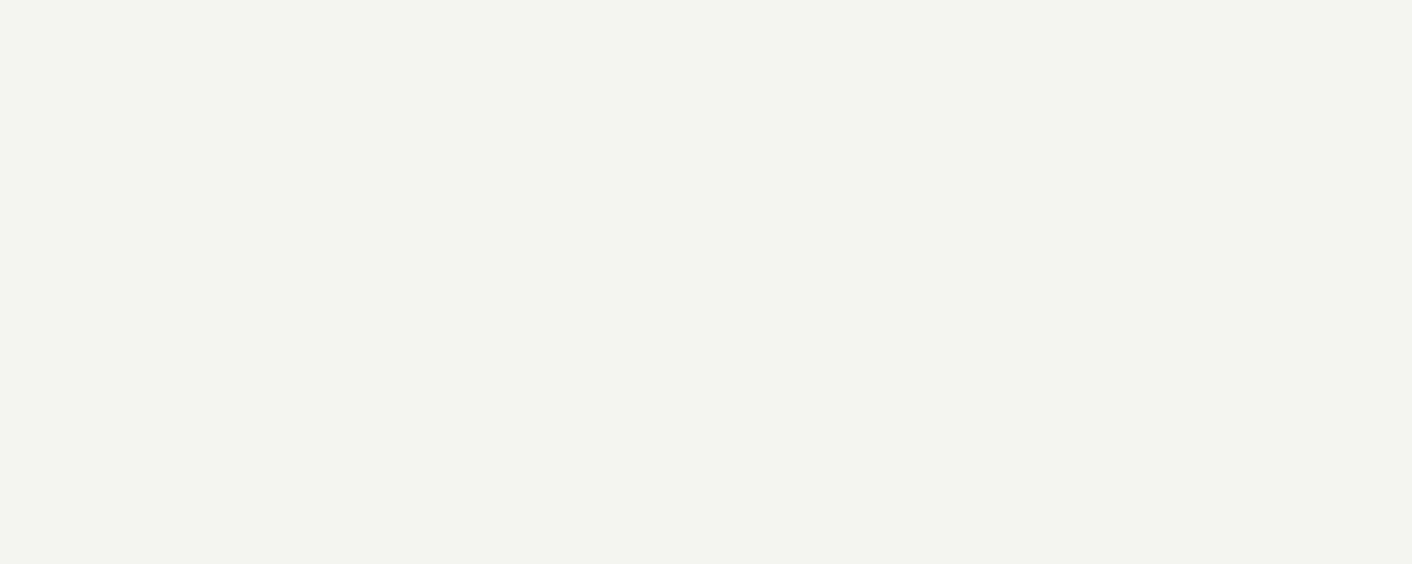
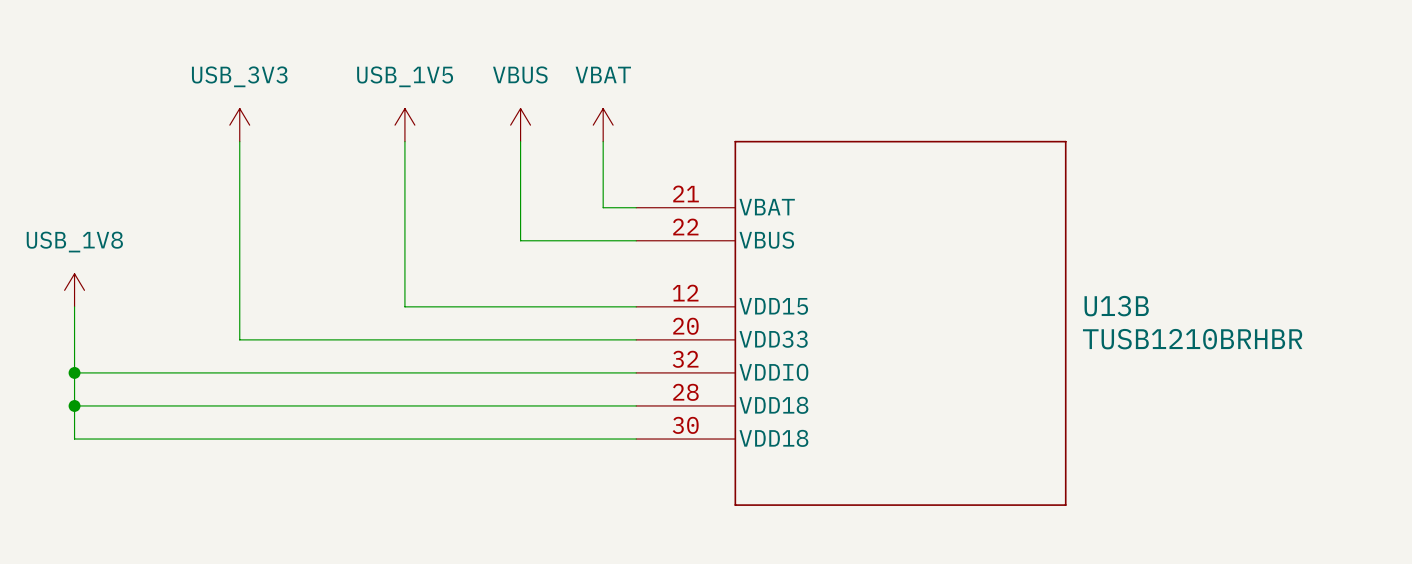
power symbol: none -> USB_3V3 (239, 125)
power symbol: none -> USB_1V5 (404, 125)
power symbol: none -> VBUS (520, 125)
power symbol: none -> VBAT (603, 125)
wire: none -> (239, 141) (239, 339) (636, 339)
wire: none -> (404, 141) (404, 306) (636, 306)
wire: none -> (520, 141) (520, 240) (636, 240)
wire: none -> (603, 141) (603, 207) (636, 207)
power symbol: none -> USB_1V8 (74, 290)
wire: none -> (74, 306) (74, 439) (636, 439)
U13B: none -> TUSB1210BRHBR (851, 323)
wire: none -> (74, 372) (636, 372)
junction: none -> (74, 372)
wire: none -> (74, 405) (636, 405)
junction: none -> (74, 405)

